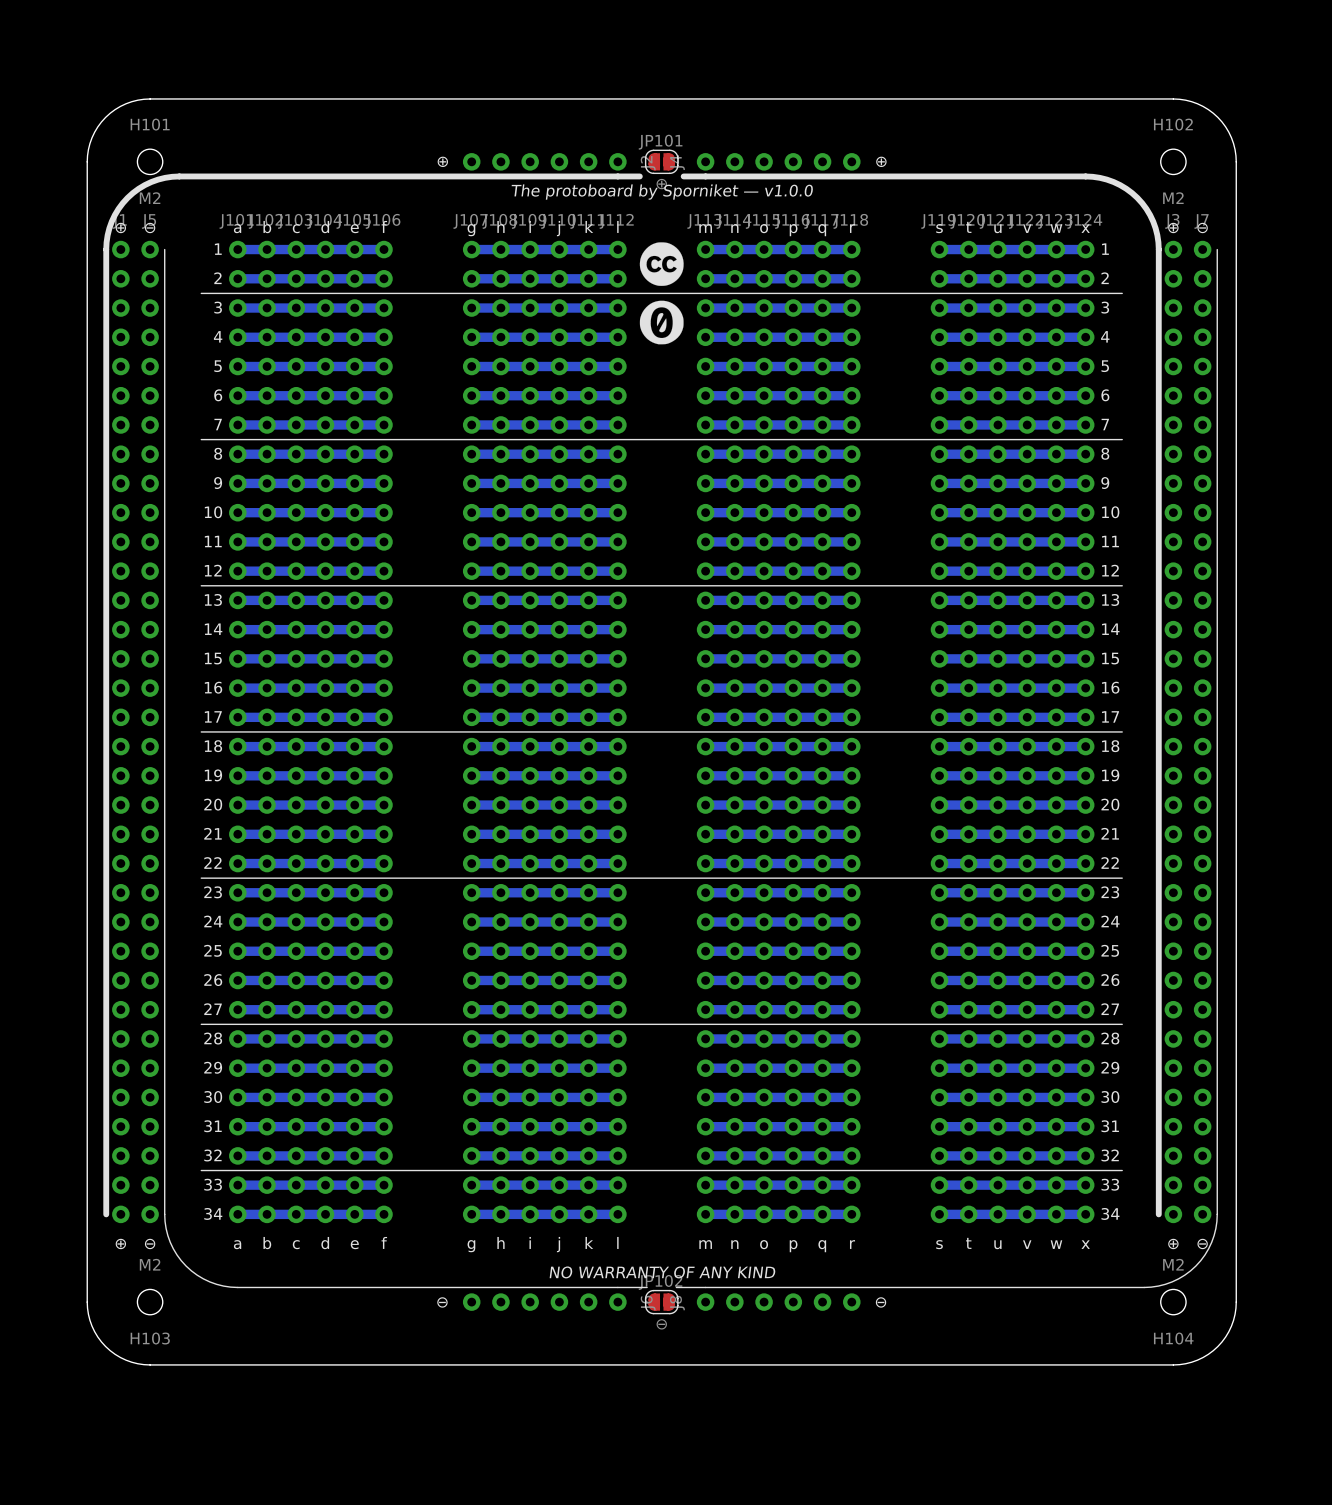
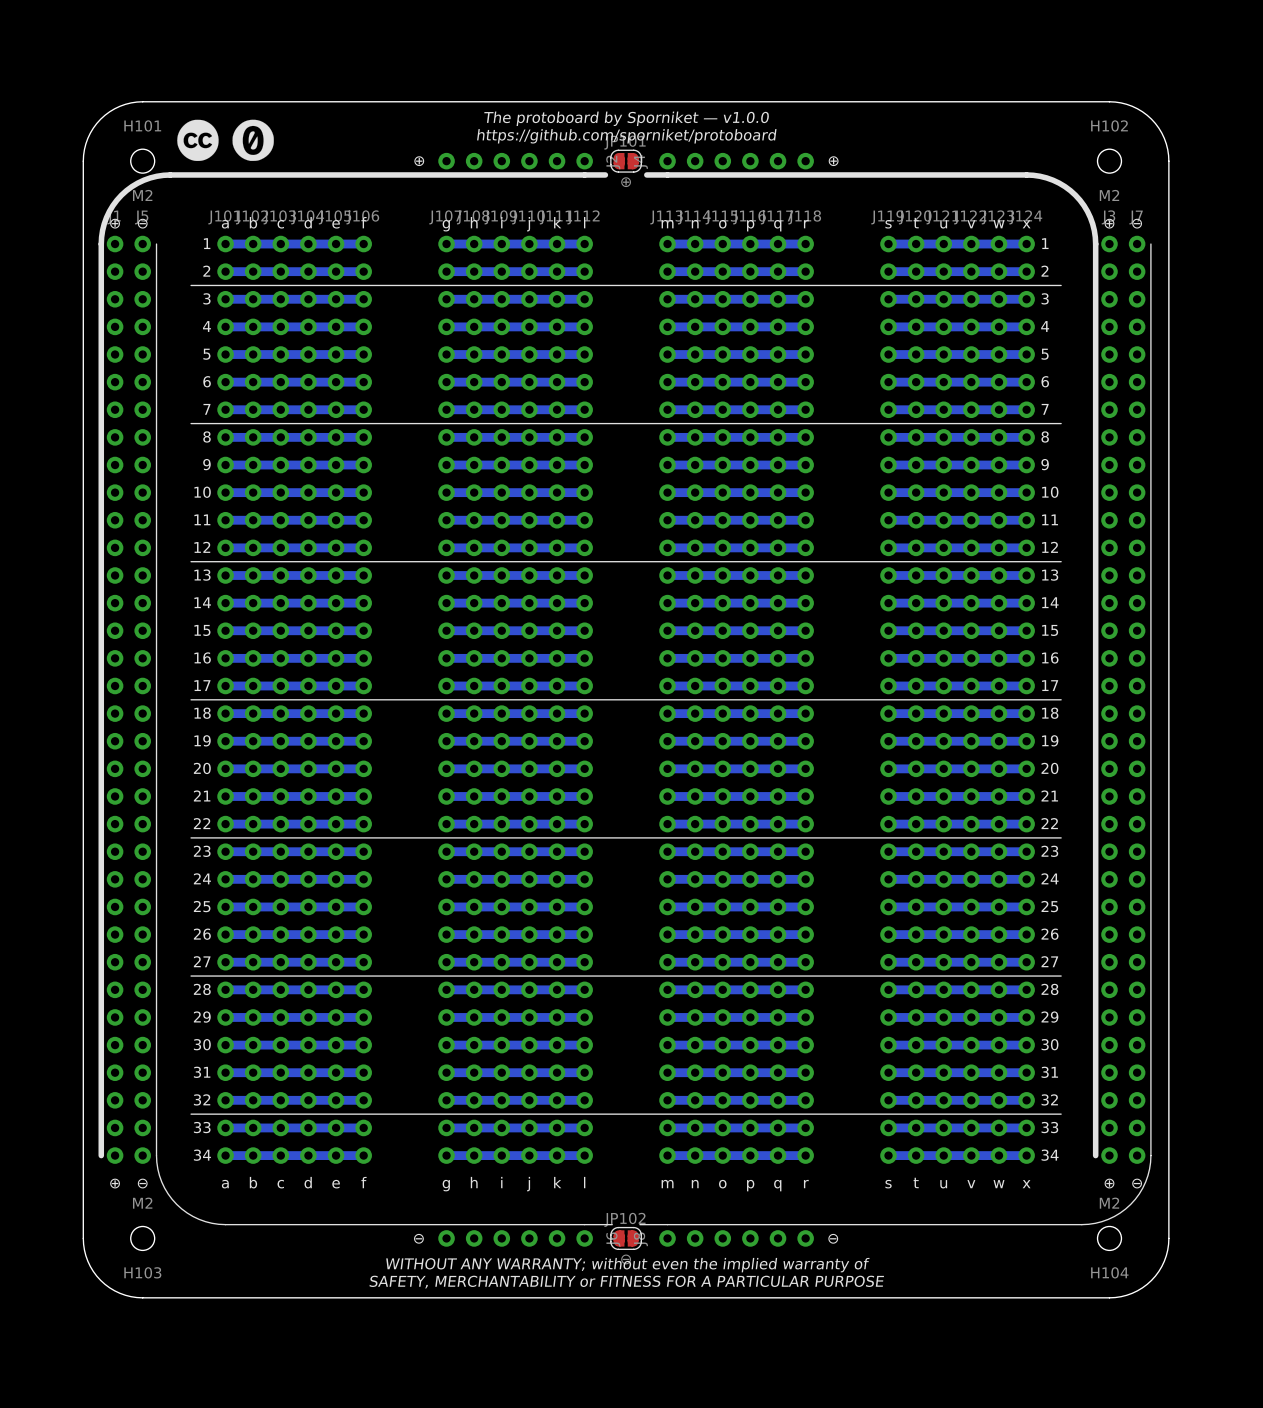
drawing: none -> [232, 119, 274, 161]
drawing: none -> [177, 119, 219, 162]
text: none -> https://github.com/sporniket/protoboard (626, 136)
text position: The protoboard by Sporniket — v1.0.0 (662, 192) -> The protoboard by Sporniket — v1.0.0 (626, 118)
drawing: [639, 242, 684, 286] -> none
drawing: [639, 300, 684, 345] -> none
text: NO WARRANTY OF ANY KIND (662, 1272) -> none
text: none -> WITHOUT ANY WARRANTY; without even the implied warranty of (627, 1265)
text: none -> SAFETY, MERCHANTABILITY or FITNESS FOR A PARTICULAR PURPOSE (626, 1282)

